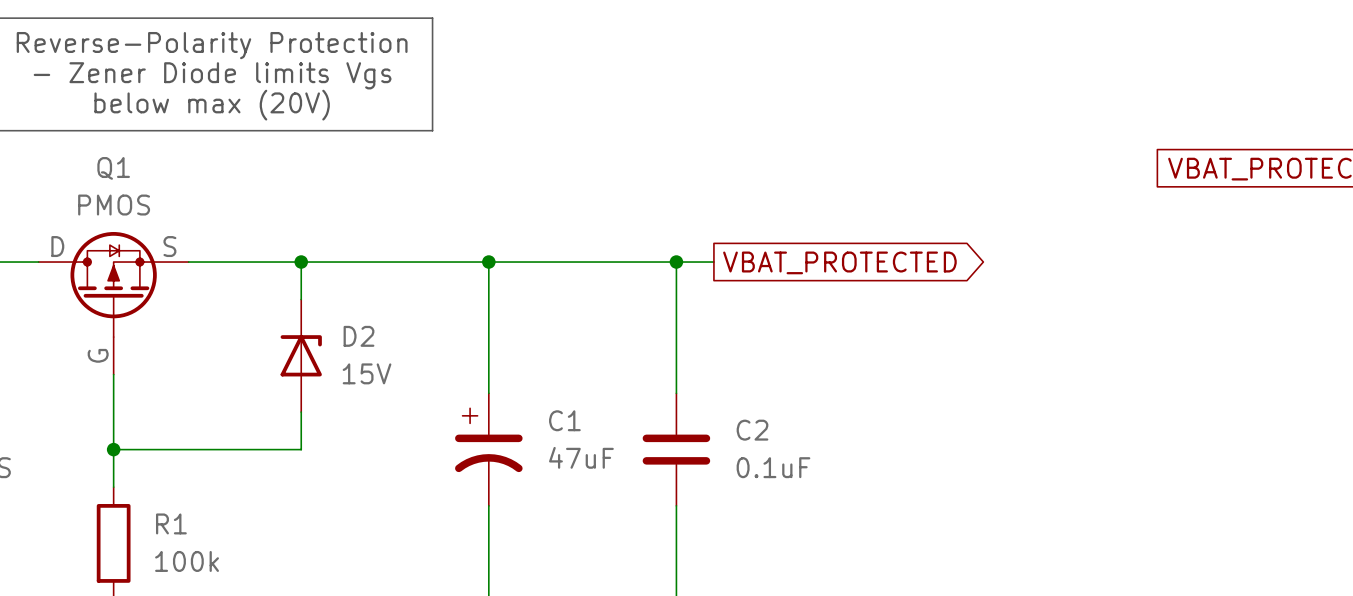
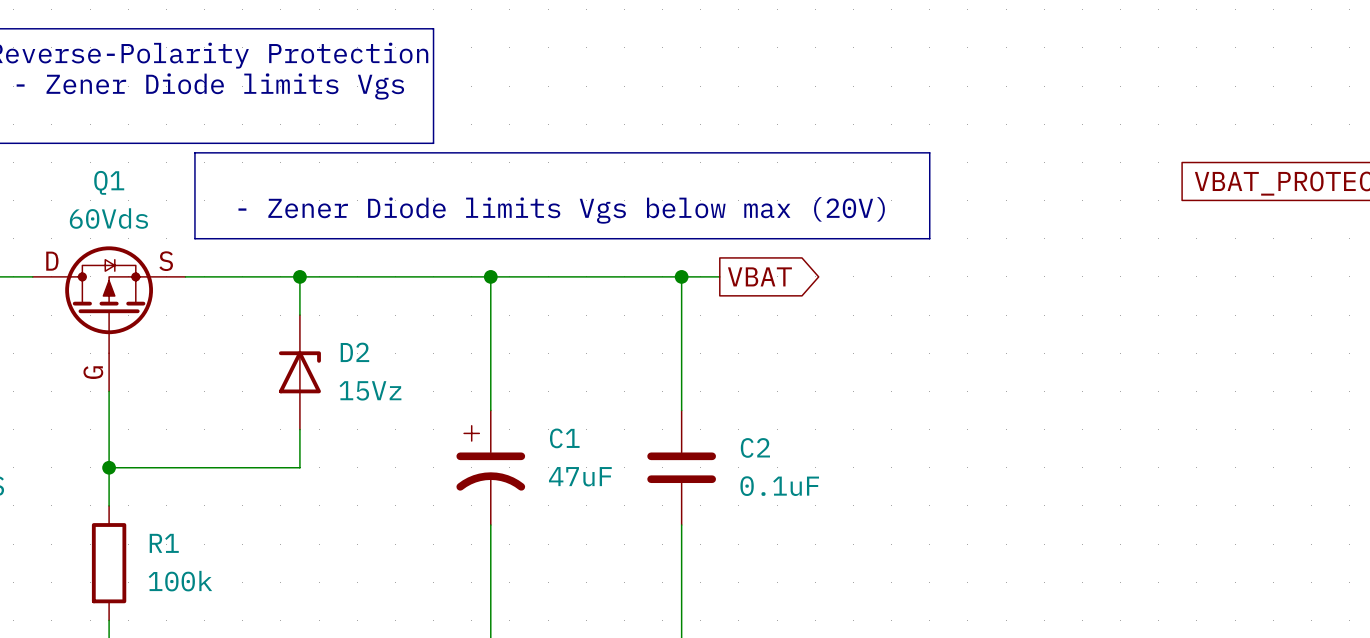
text: below max (20V) (212, 105) -> none
line: none -> (194, 152) (929, 152) (929, 238) (194, 238) (194, 152)
text: none -> - Zener Diode limits Vgs below max (20V) (561, 210)
Q1 value: PMOS (114, 205) -> 60Vds (108, 218)
global label: VBAT_PROTECTED (839, 262) -> VBAT (759, 276)
D2 value: 15V (367, 373) -> 15Vz (370, 390)

